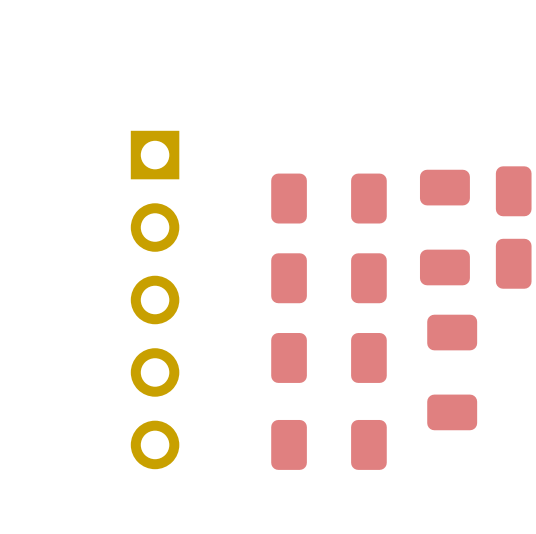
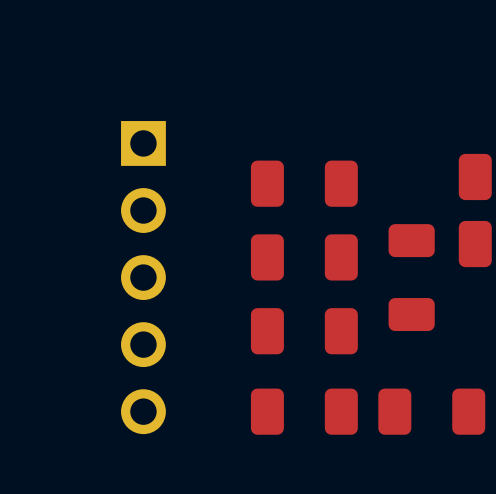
part: (444, 227) -> none
part: none -> (411, 277)
part: (452, 372) -> none
part: none -> (431, 411)

